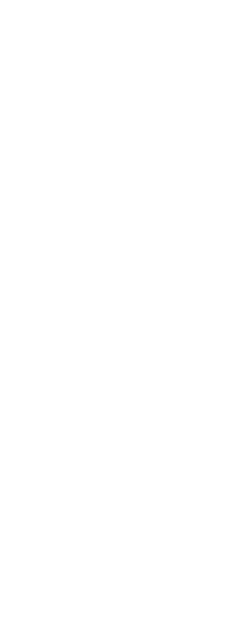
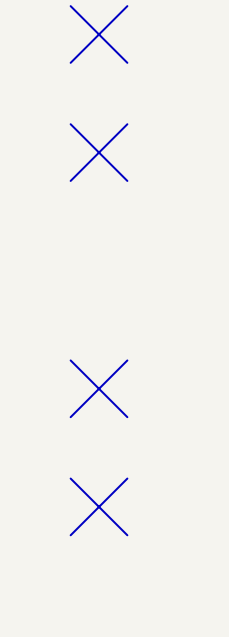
no-connect mark: none -> (99, 34)
no-connect mark: none -> (99, 152)
no-connect mark: none -> (99, 388)
no-connect mark: none -> (99, 506)

